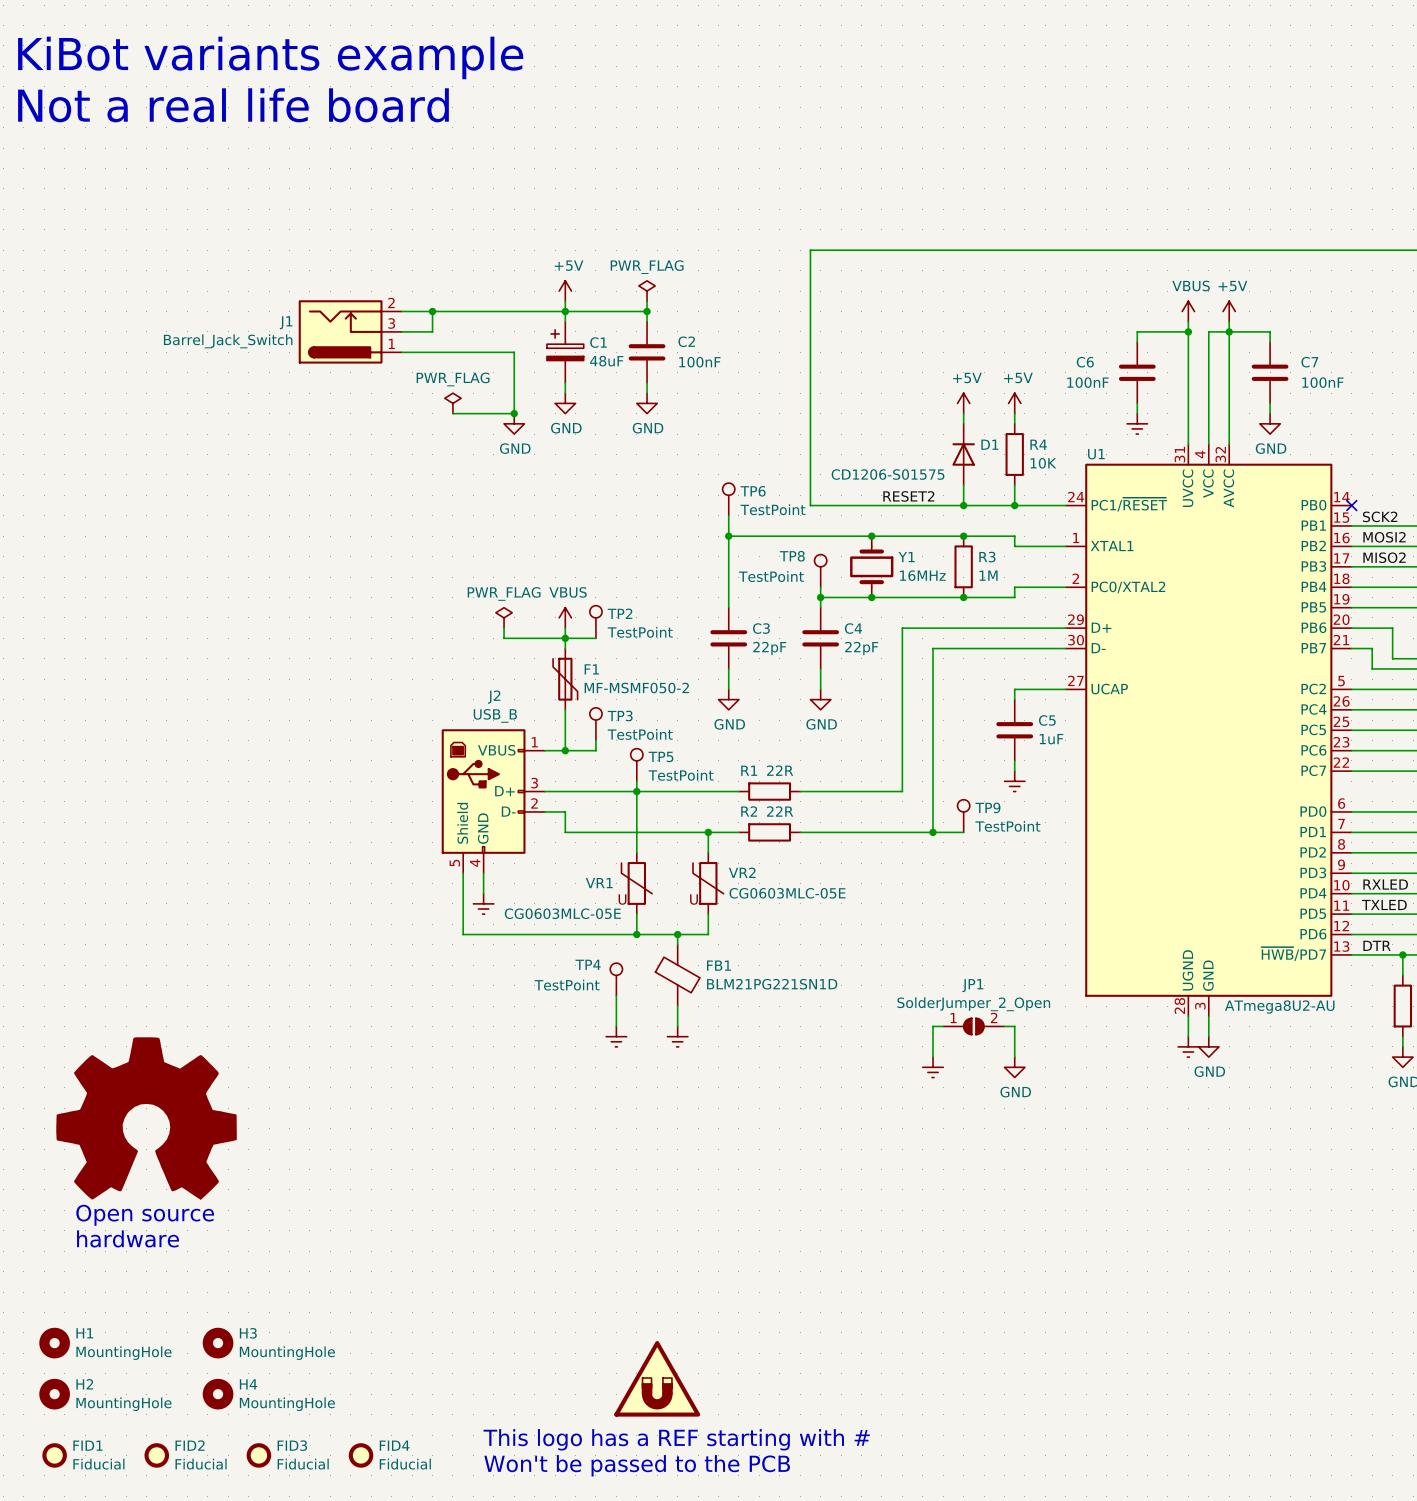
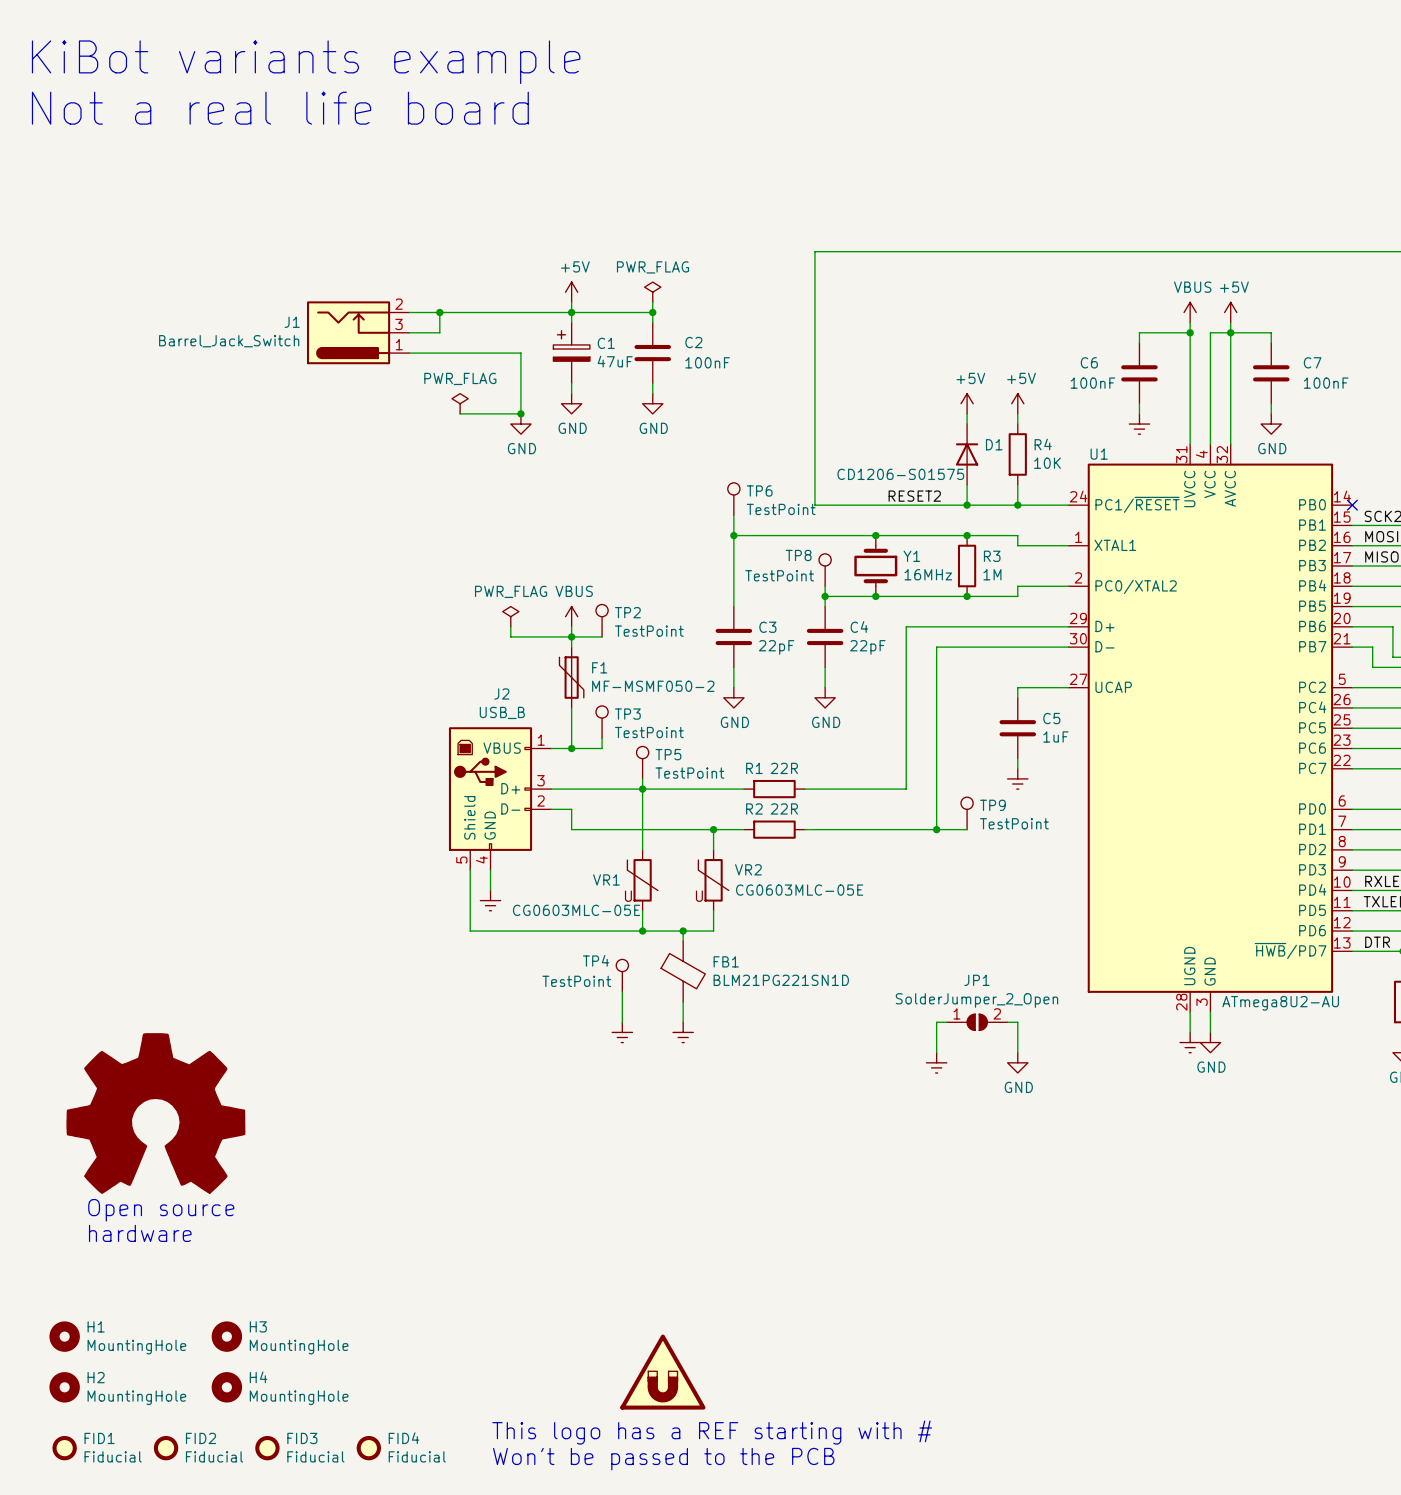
C1 value: 48uF (606, 361) -> 47uF (615, 361)

